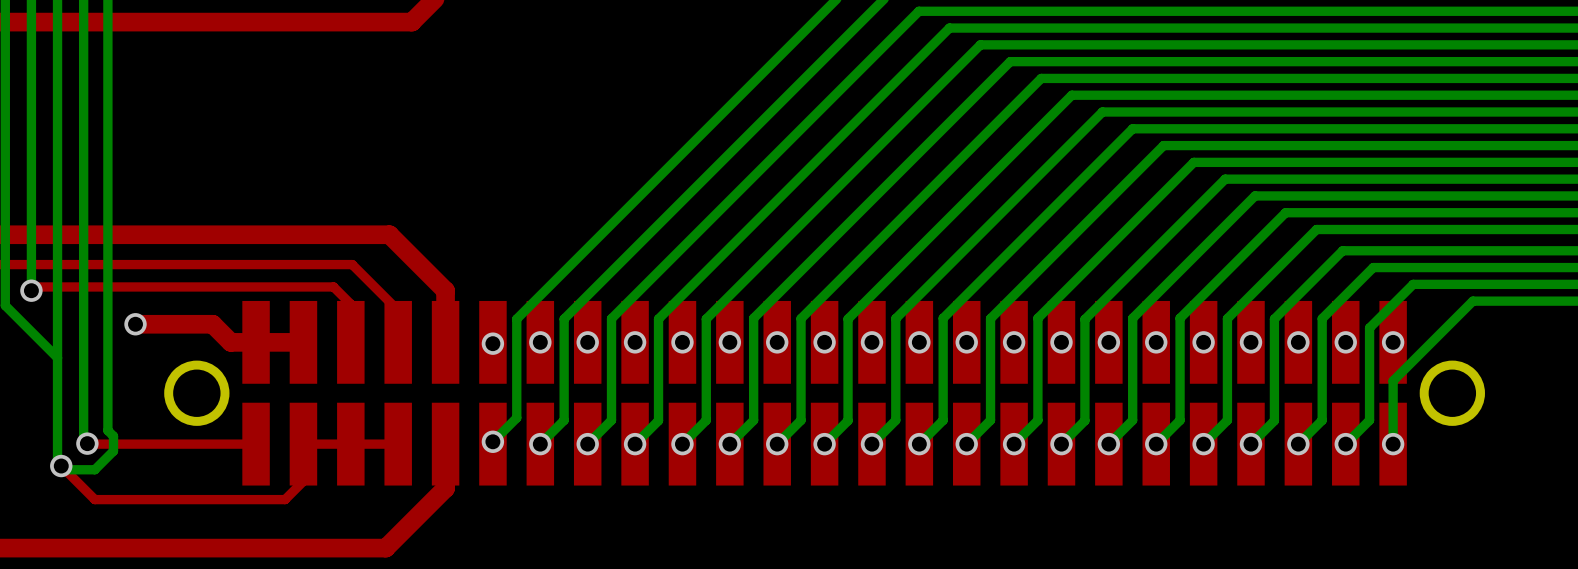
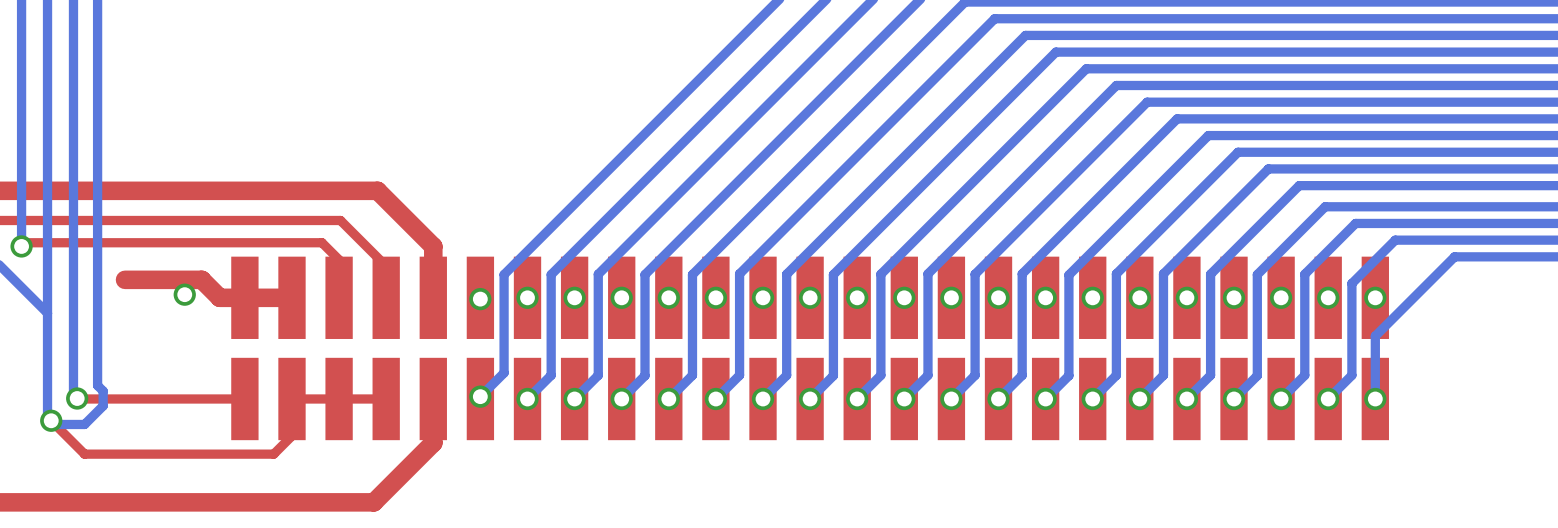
part footprint: [164, 300, 1485, 486] -> [231, 256, 1389, 441]
via position: (135, 324) -> (184, 294)

